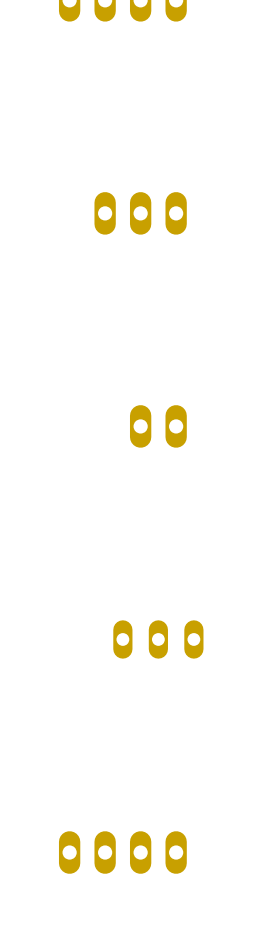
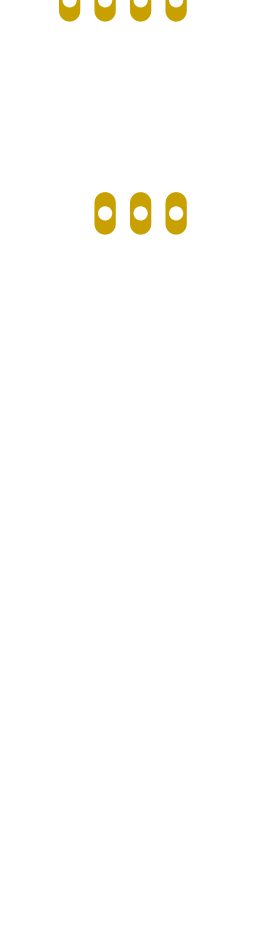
part: (158, 426) -> none
part: (158, 639) -> none
part: (122, 852) -> none

